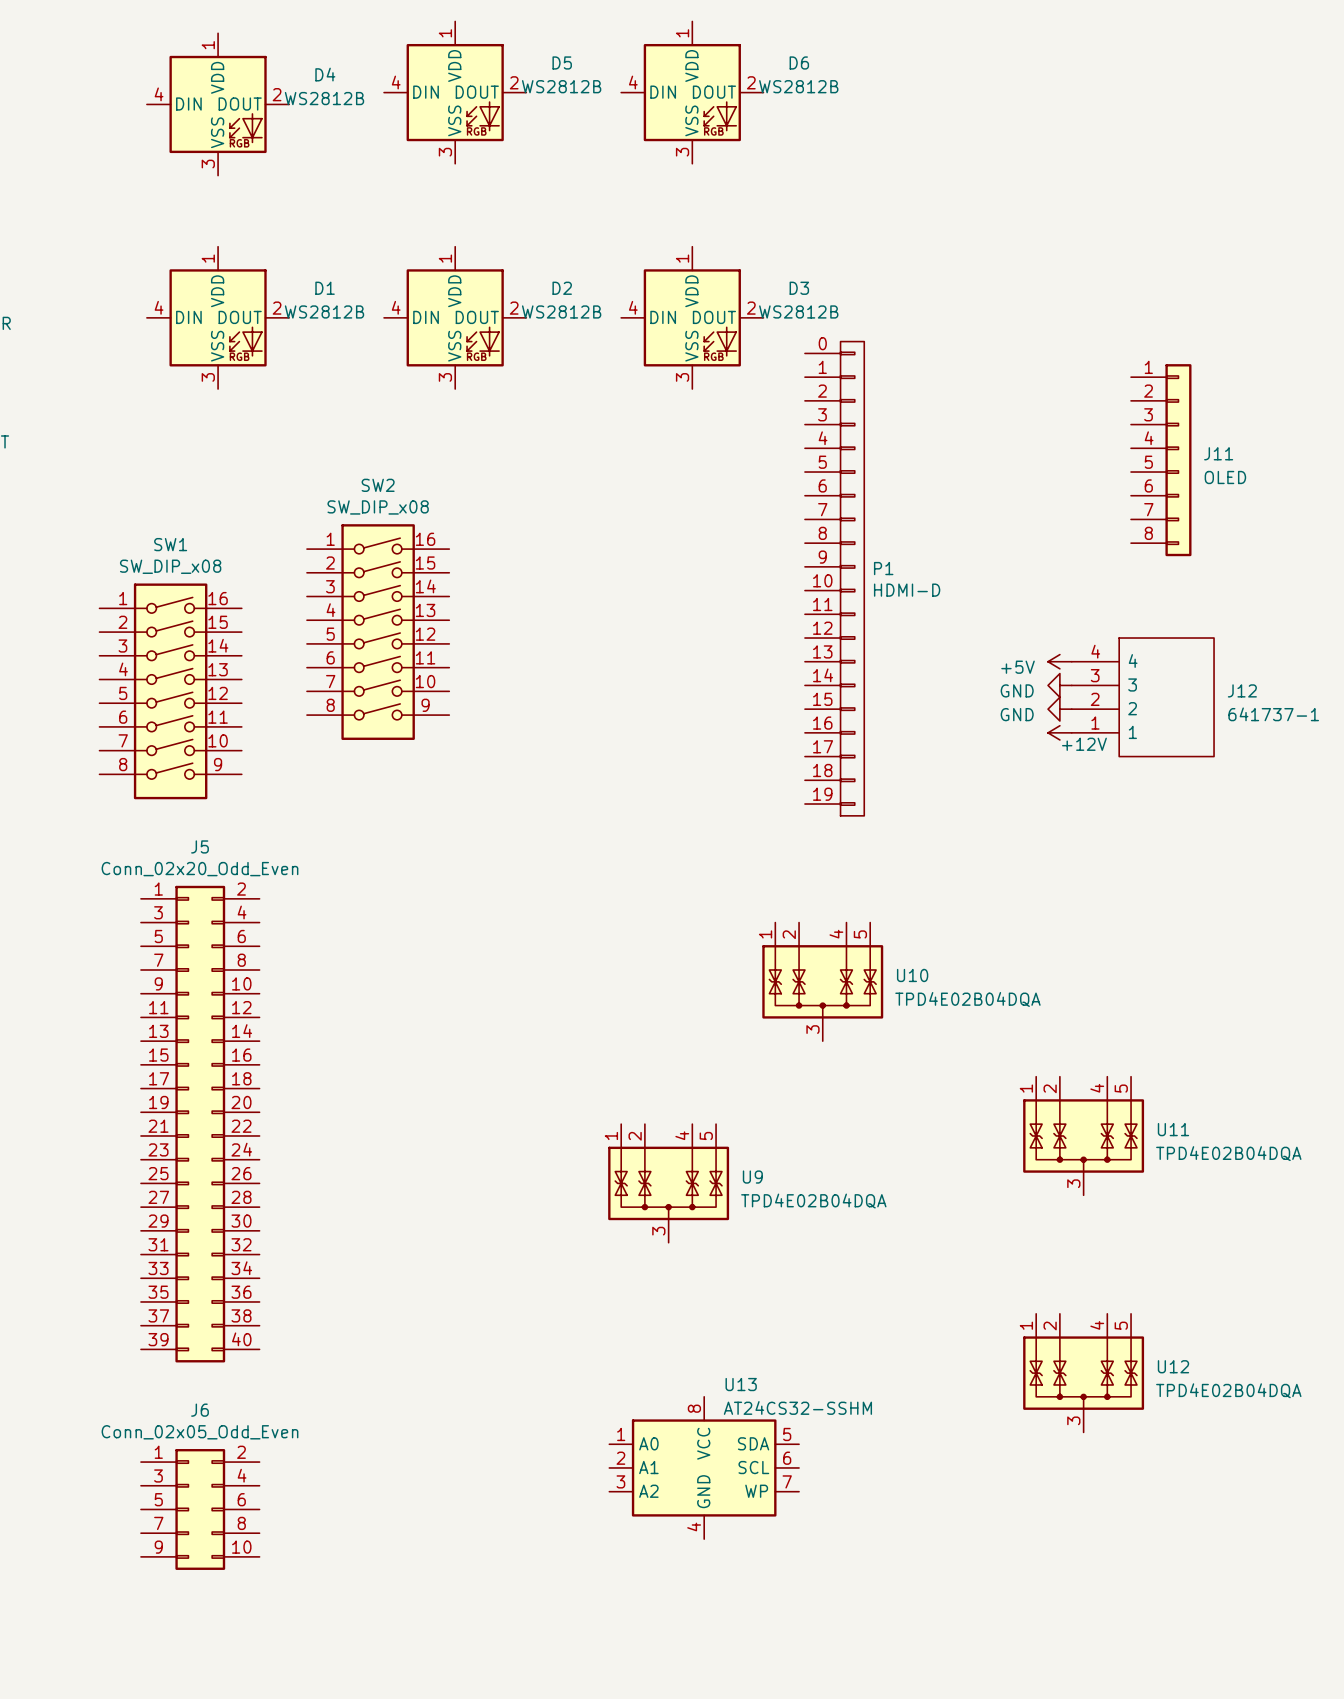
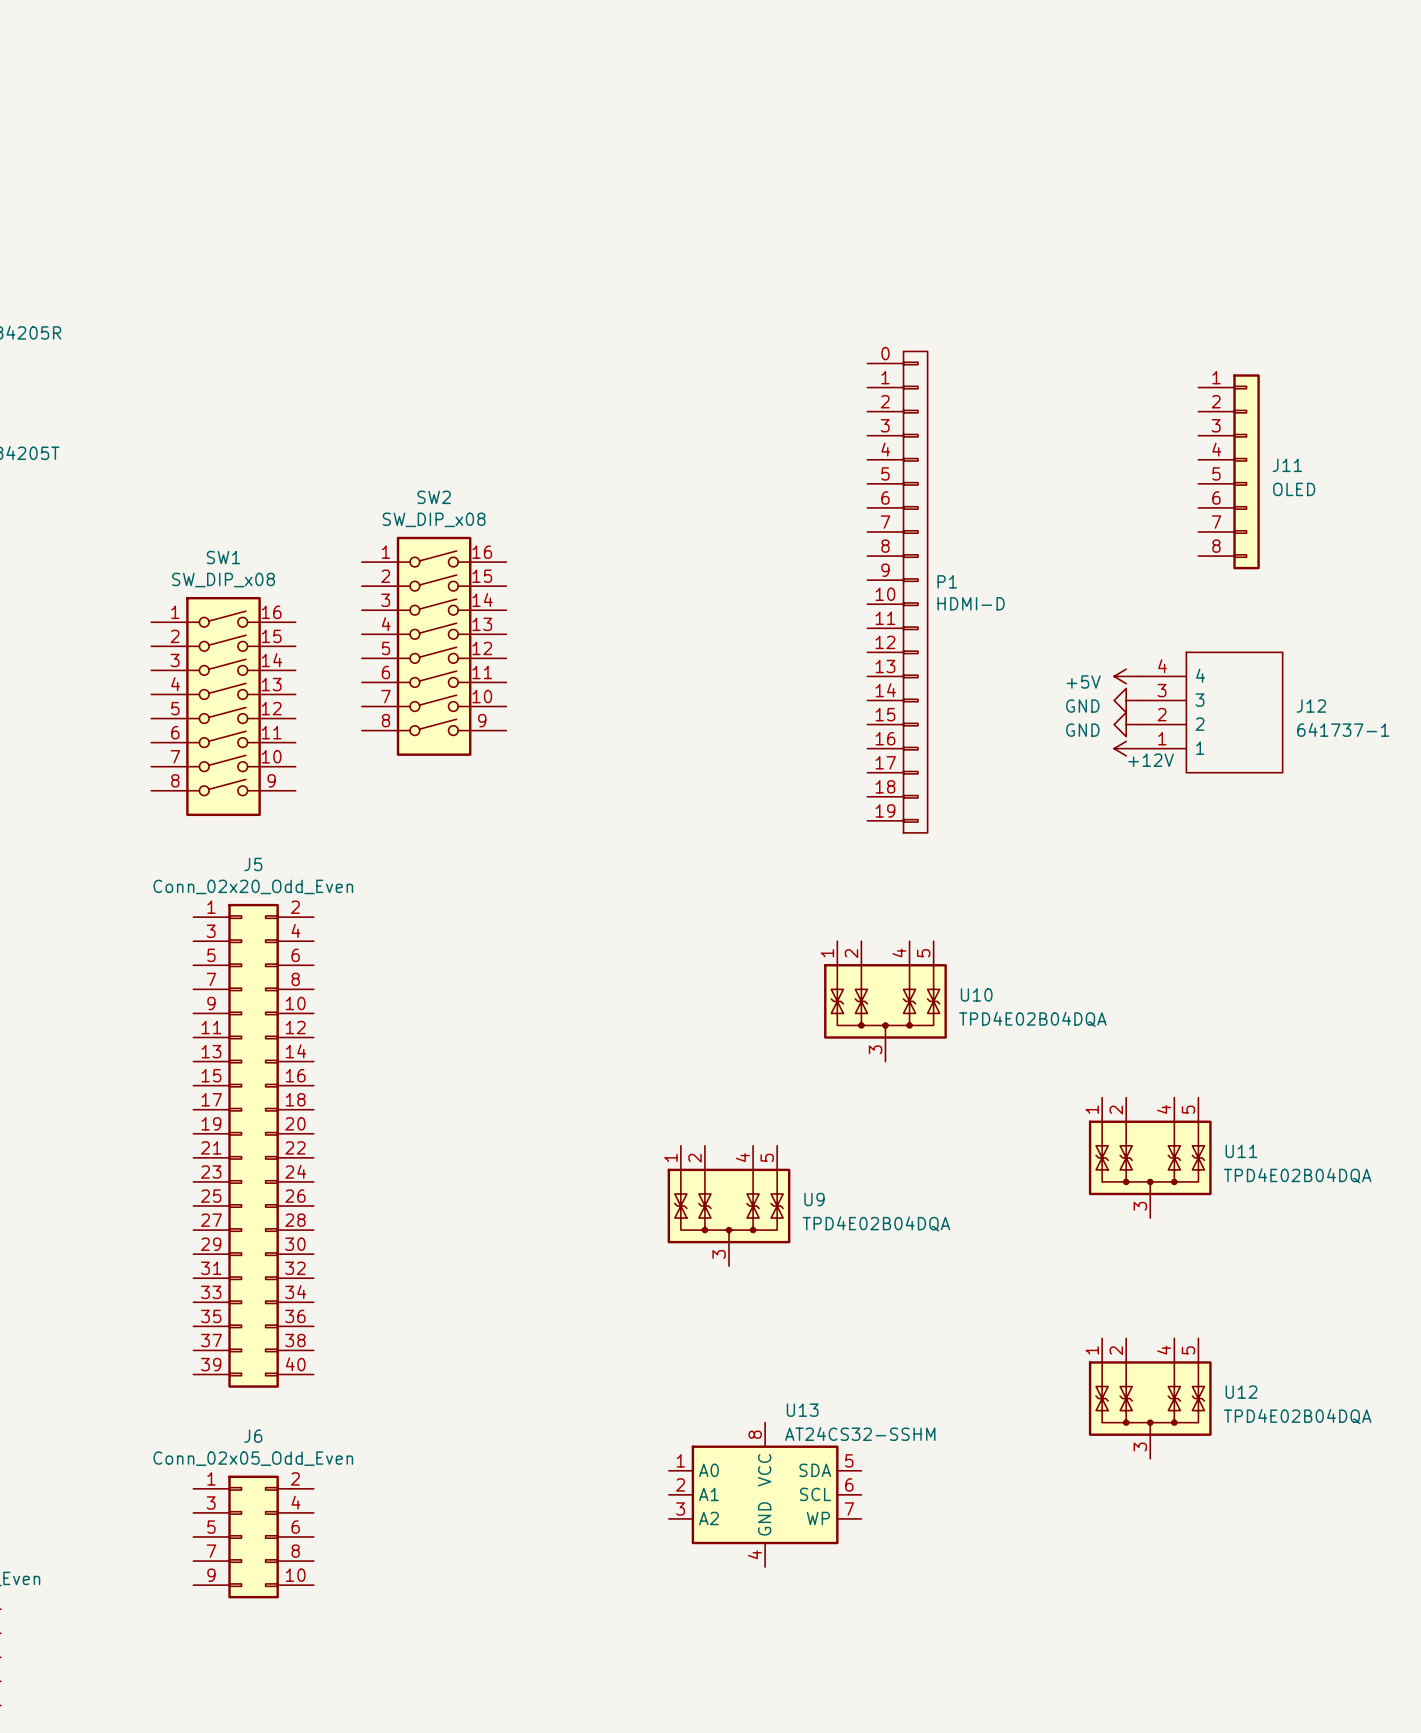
D5: WS2812B (455, 92) -> none
D6: WS2812B (692, 92) -> none
D4: WS2812B (218, 104) -> none
D1: WS2812B (218, 317) -> none
D2: WS2812B (455, 317) -> none
D3: WS2812B (692, 317) -> none

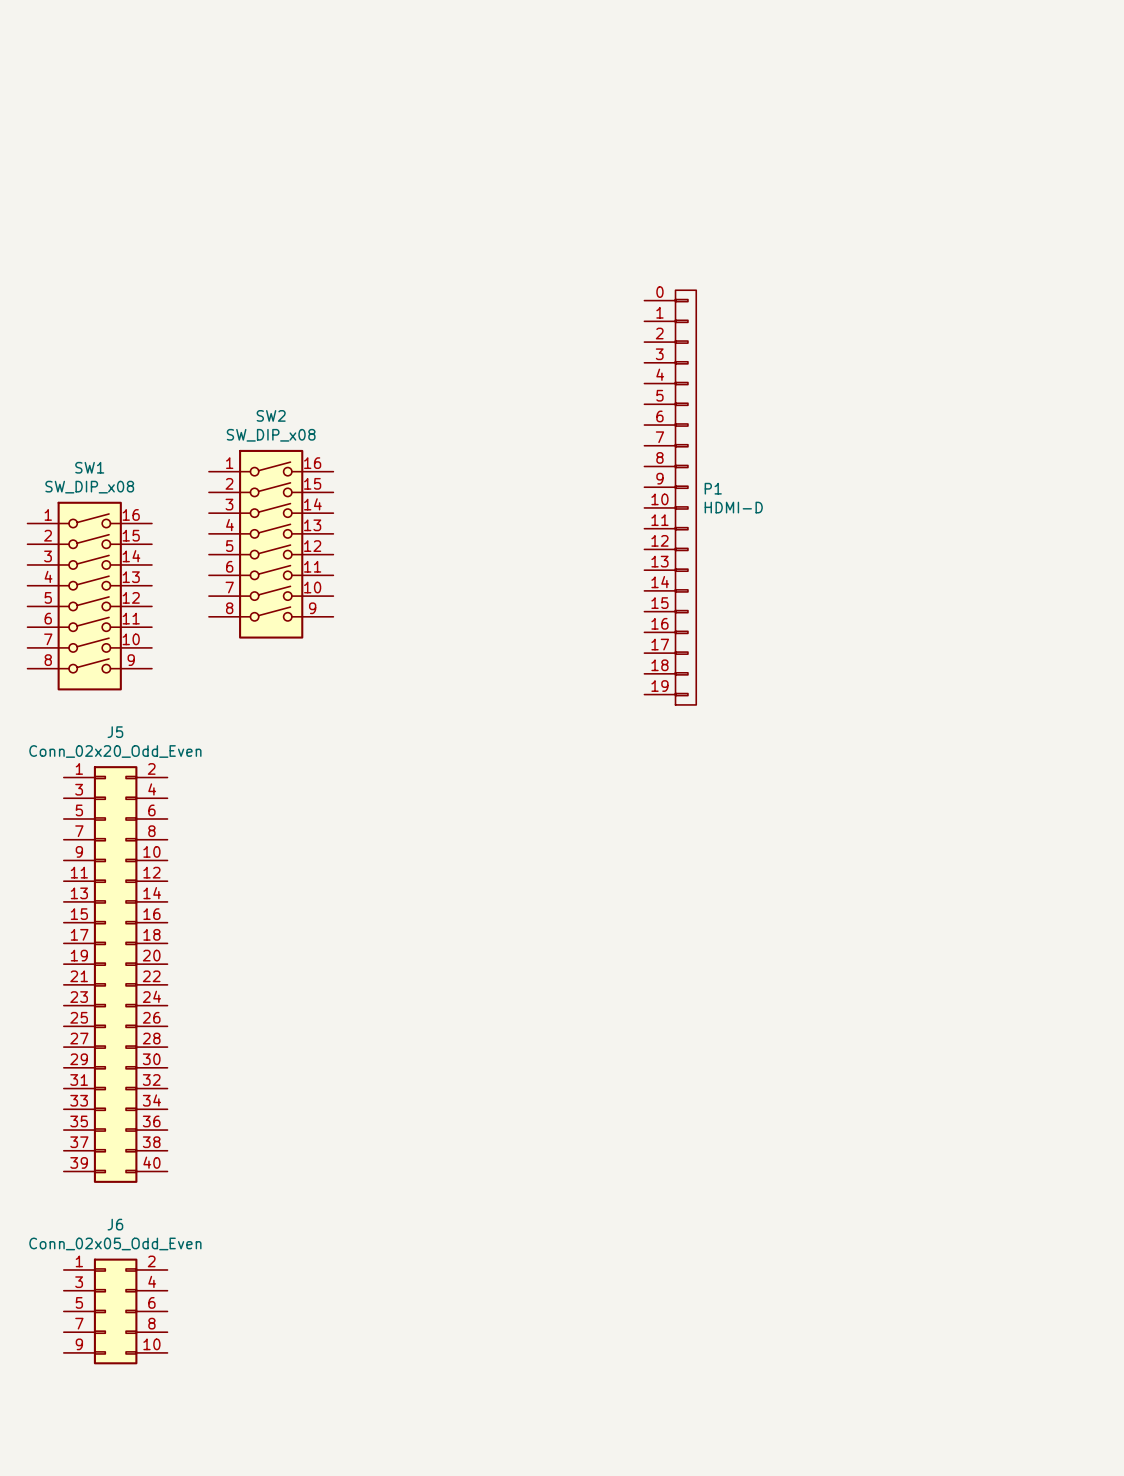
J11: OLED (1229, 471) -> none
power symbol: +5V (1126, 676) -> none
power symbol: GND (1126, 700) -> none
J12: 641737-1 (1210, 712) -> none
power symbol: GND (1126, 724) -> none
power symbol: +12V (1126, 748) -> none
U10: TPD4E02B04DQA (885, 1001) -> none
U11: TPD4E02B04DQA (1150, 1157) -> none
U9: TPD4E02B04DQA (729, 1206) -> none
U12: TPD4E02B04DQA (1150, 1398) -> none
U13: AT24CS32-SSHM (765, 1494) -> none

